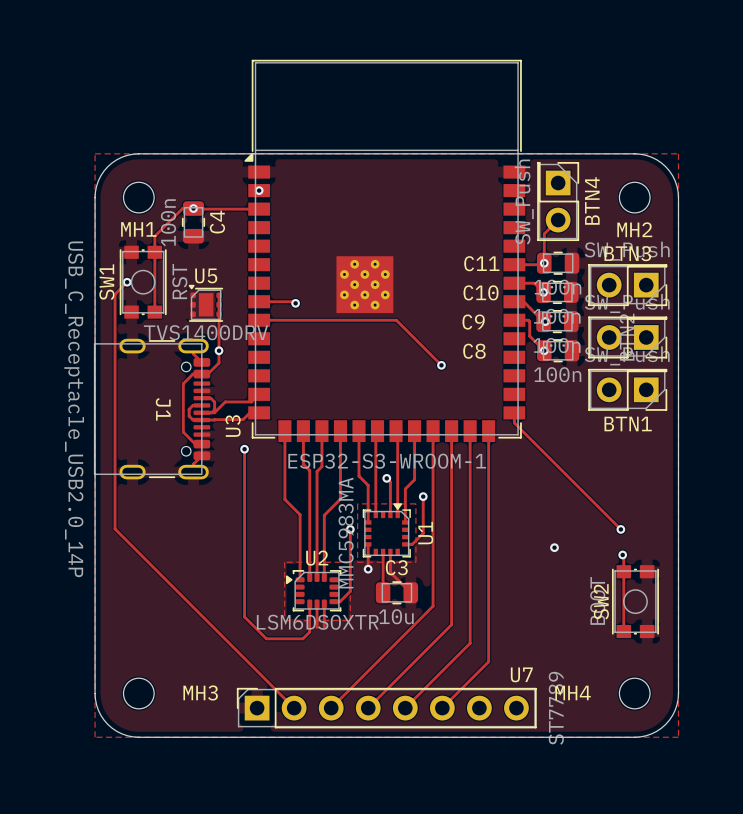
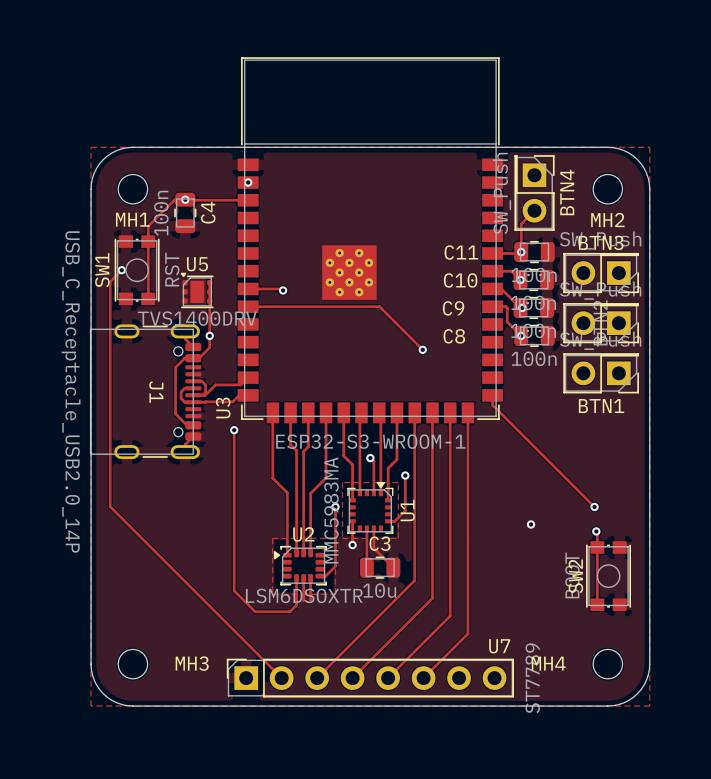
U3 footprint: [244, 59, 526, 443] -> [237, 57, 504, 424]

